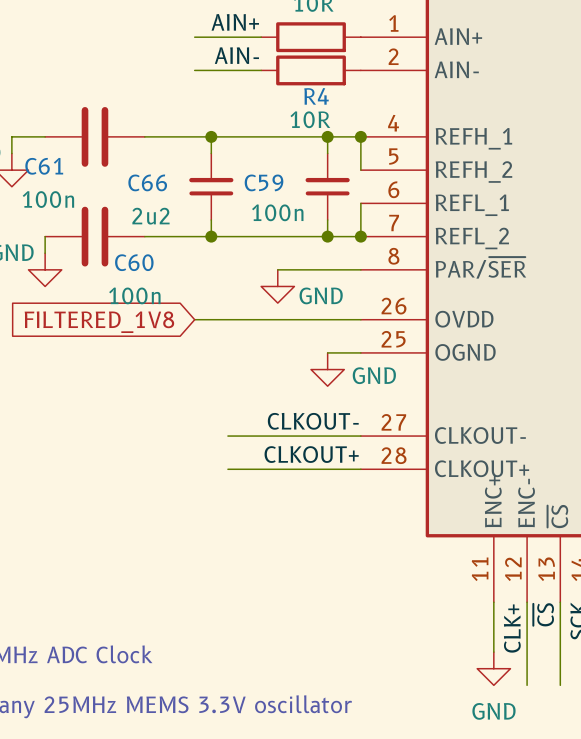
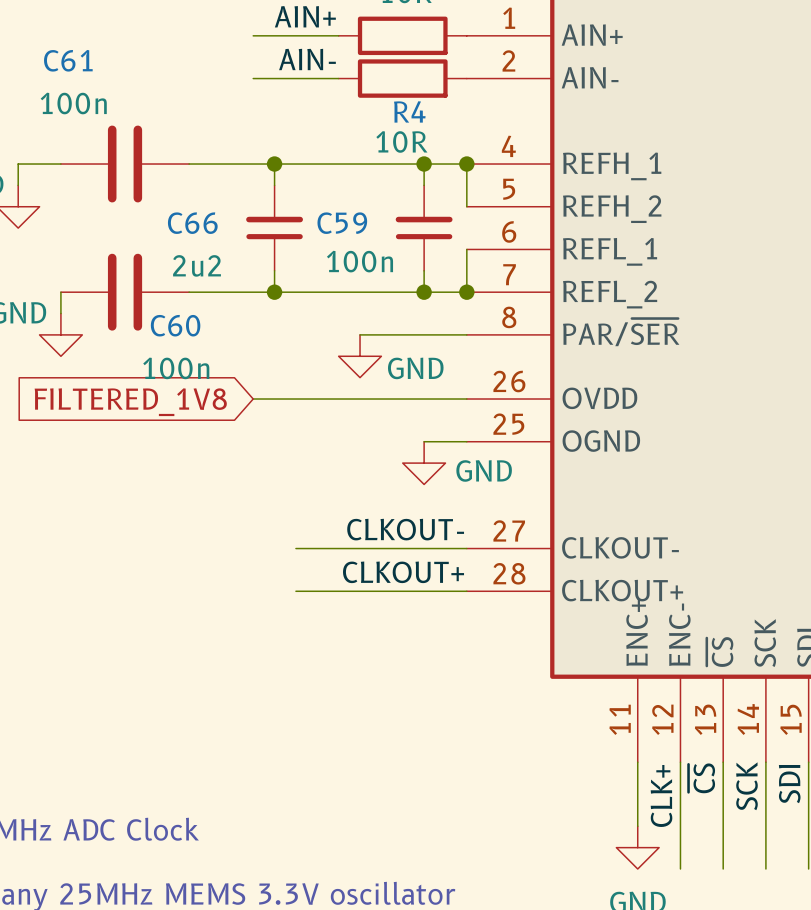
C61 name position: C61 (44, 166) -> C61 (68, 60)
C61 value position: 100n (48, 199) -> 100n (73, 103)

